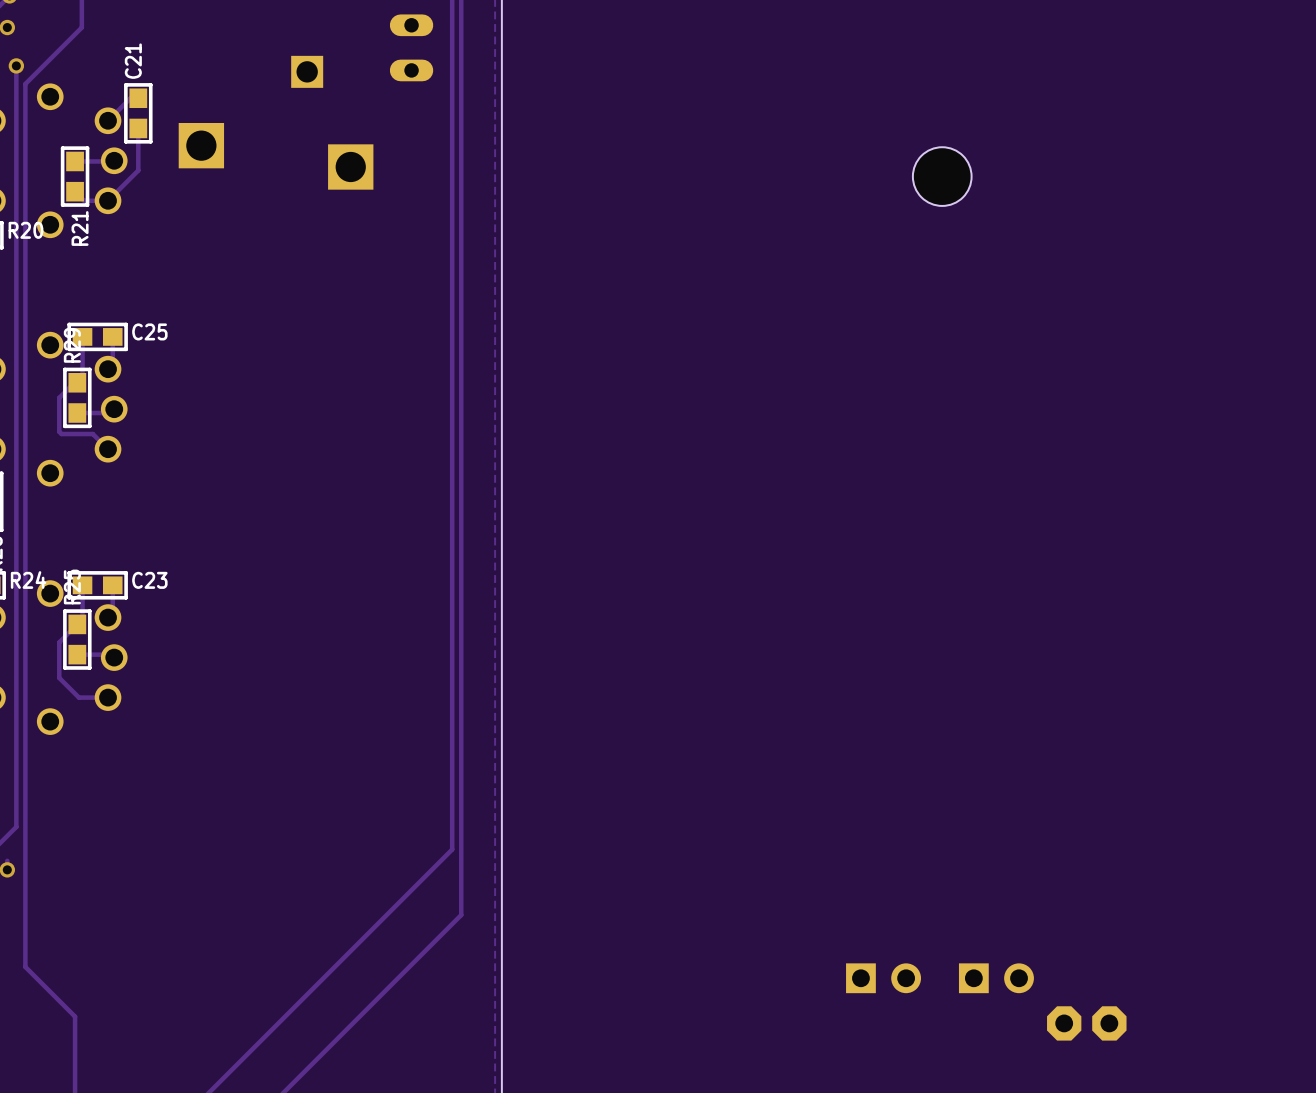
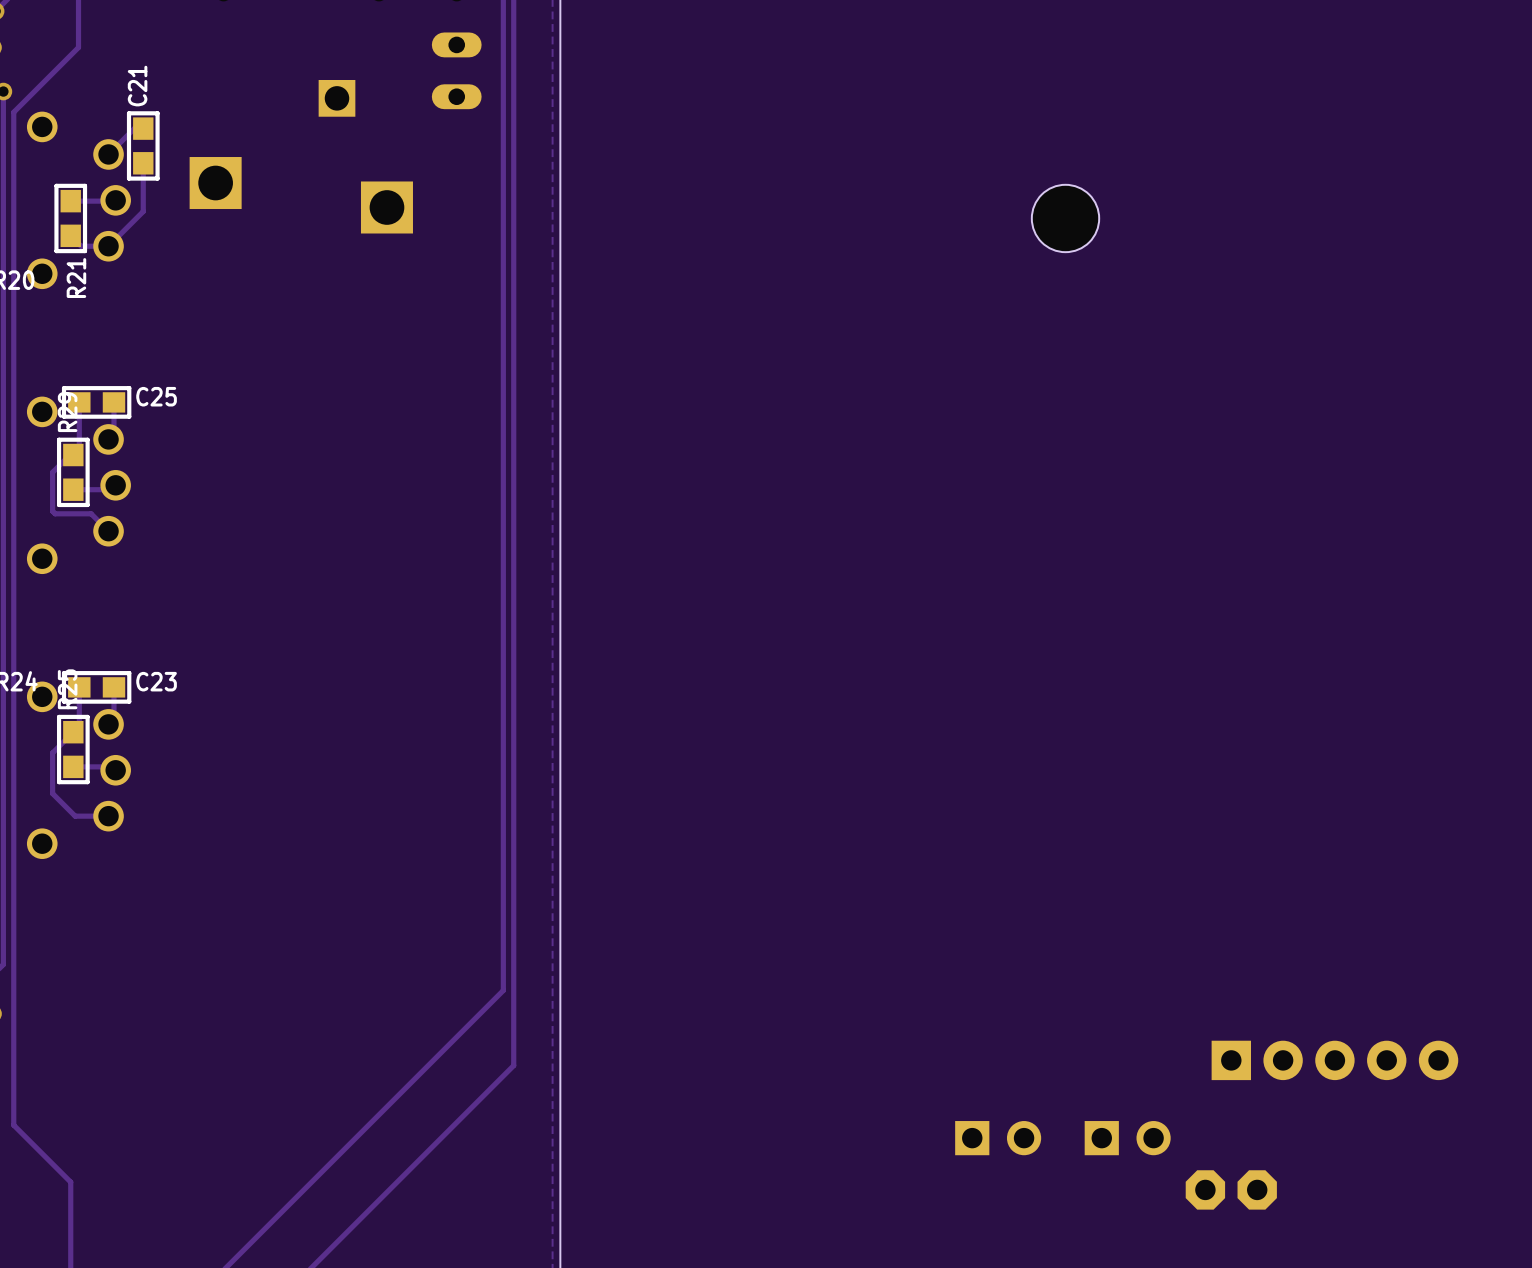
part: none -> (1334, 1060)

